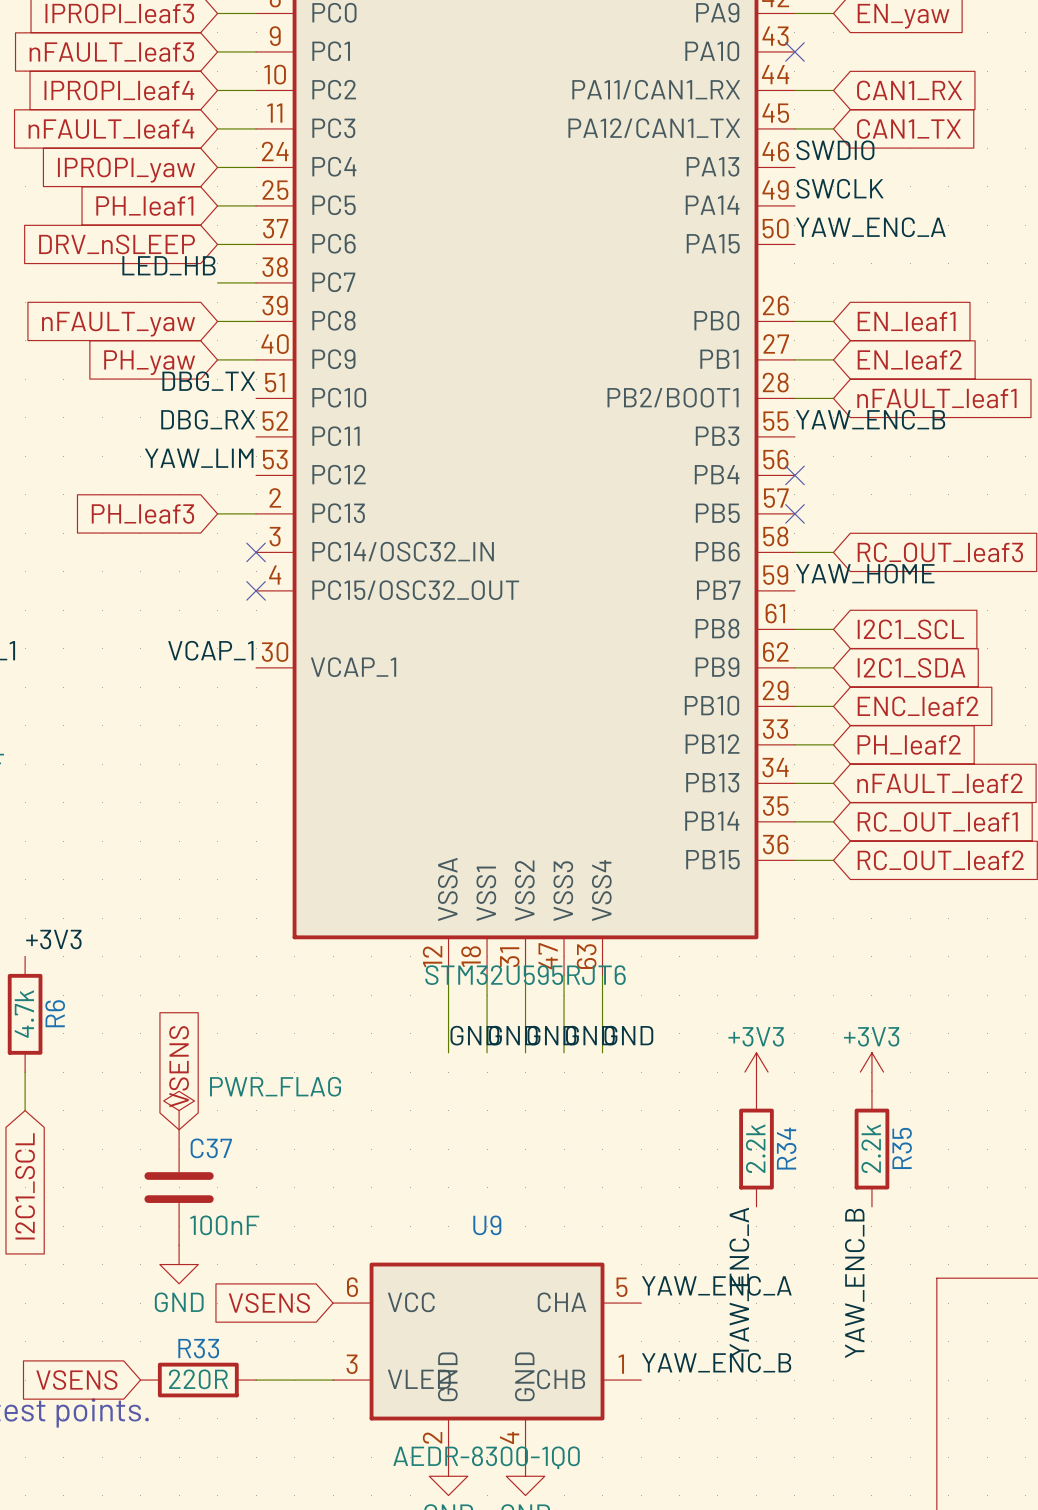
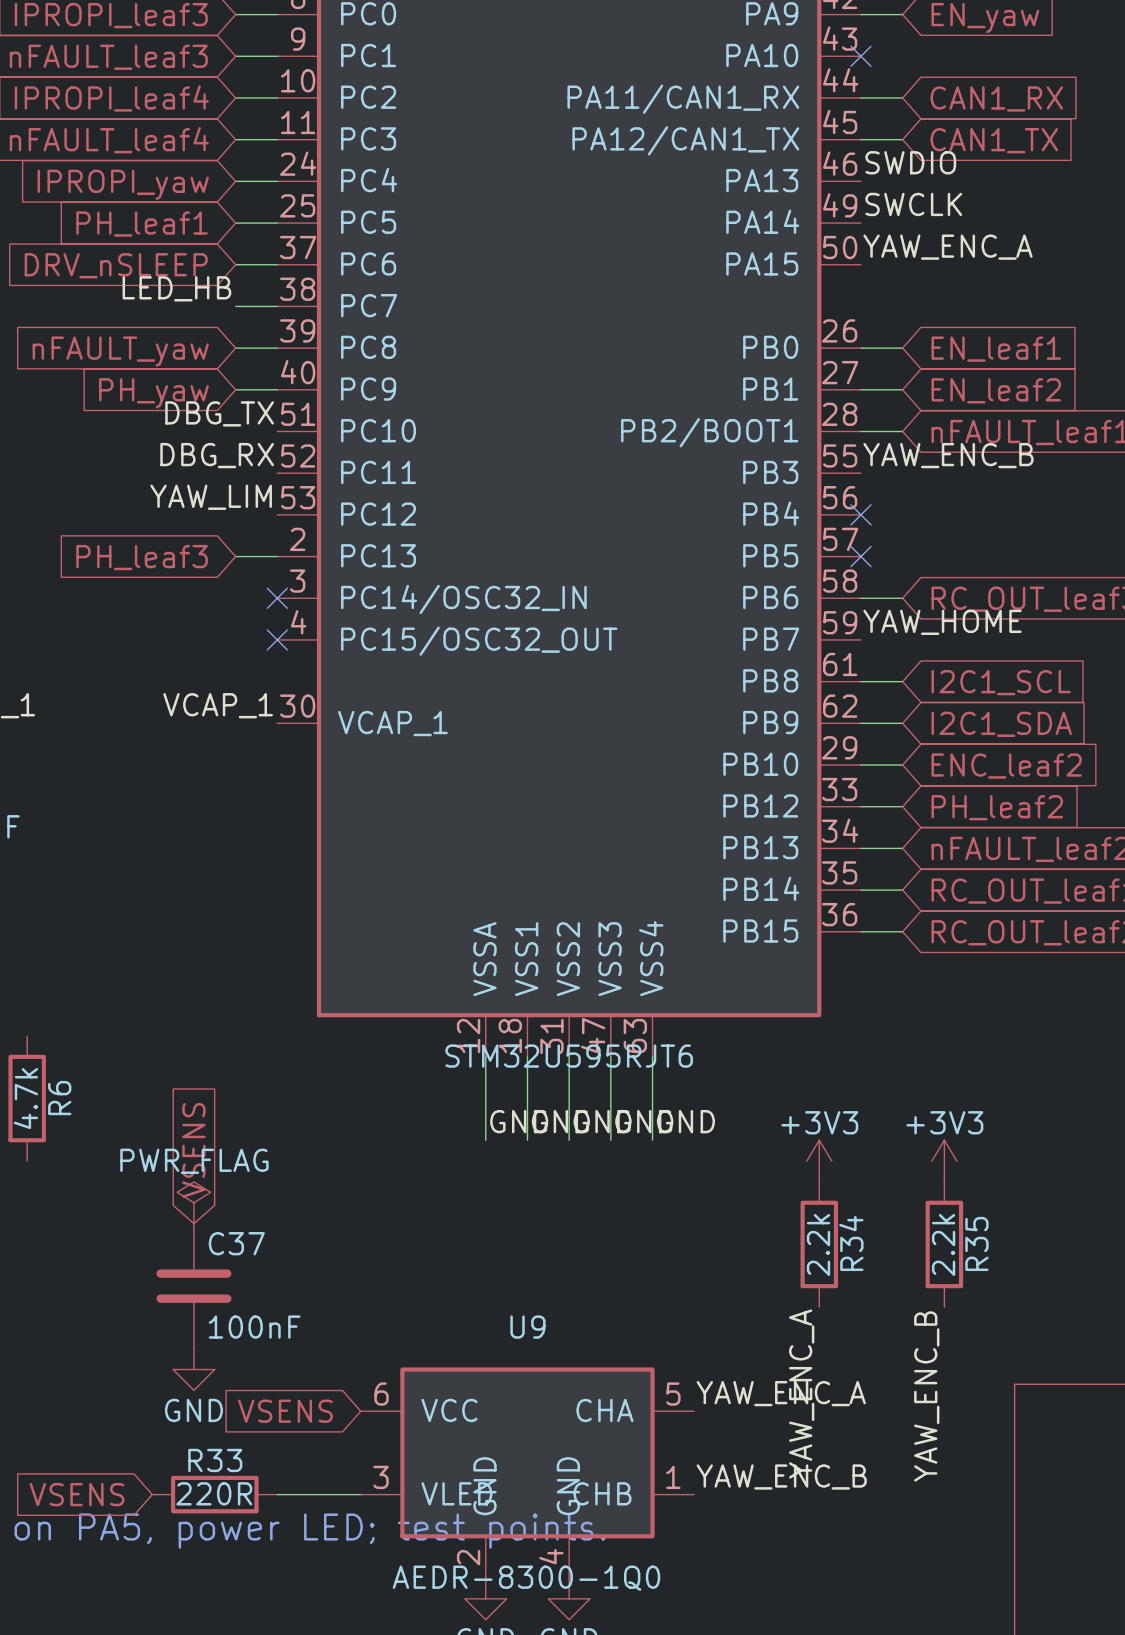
label: +3V3 (53, 939) -> none
wire: (25, 1072) (25, 1110) -> none
power symbol text position: PWR_FLAG (275, 1086) -> PWR_FLAG (194, 1161)
global label: I2C1_SCL (25, 1186) -> none

